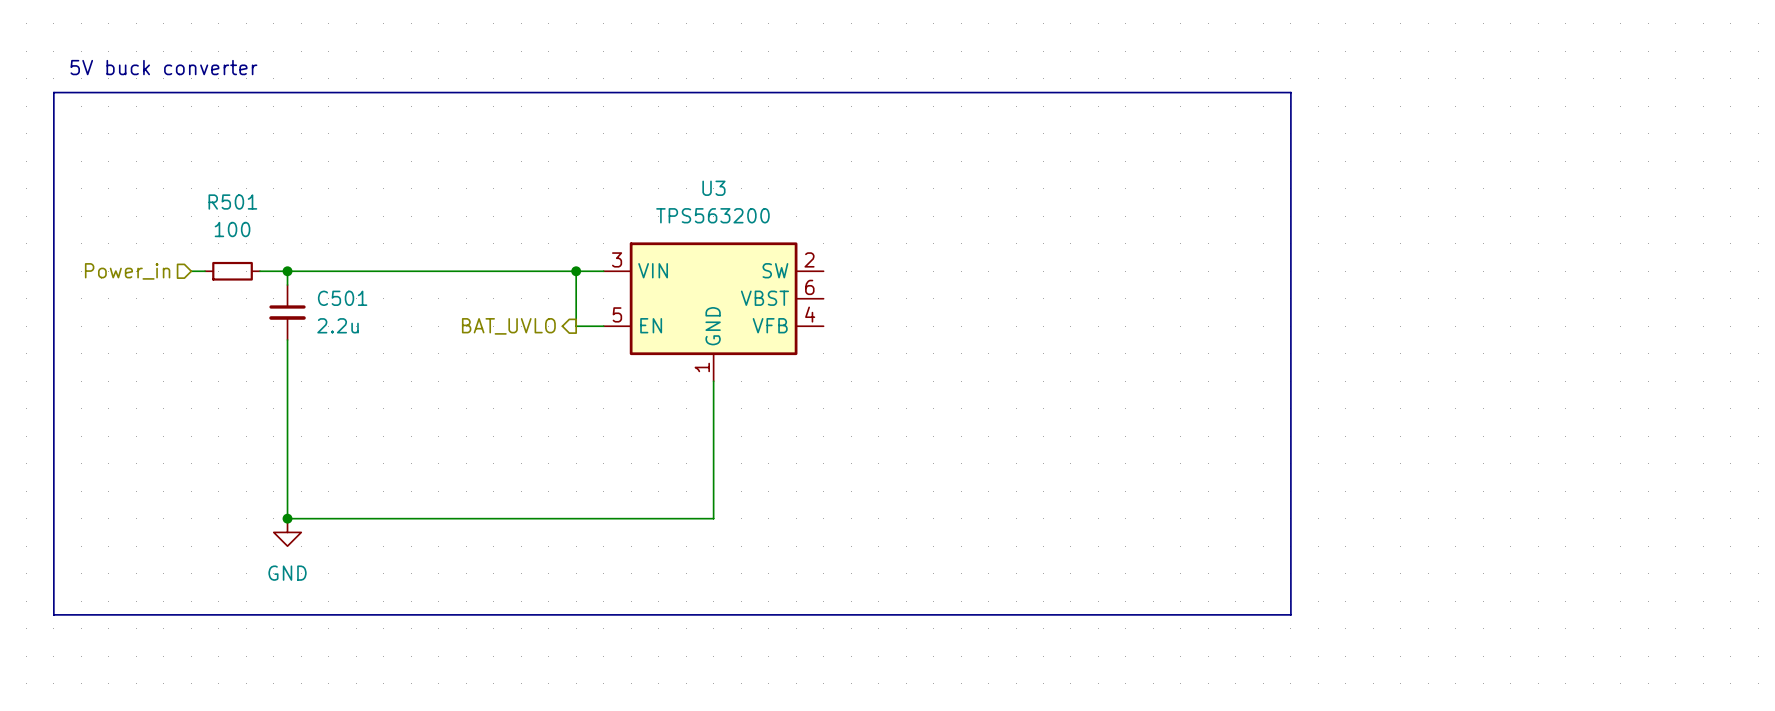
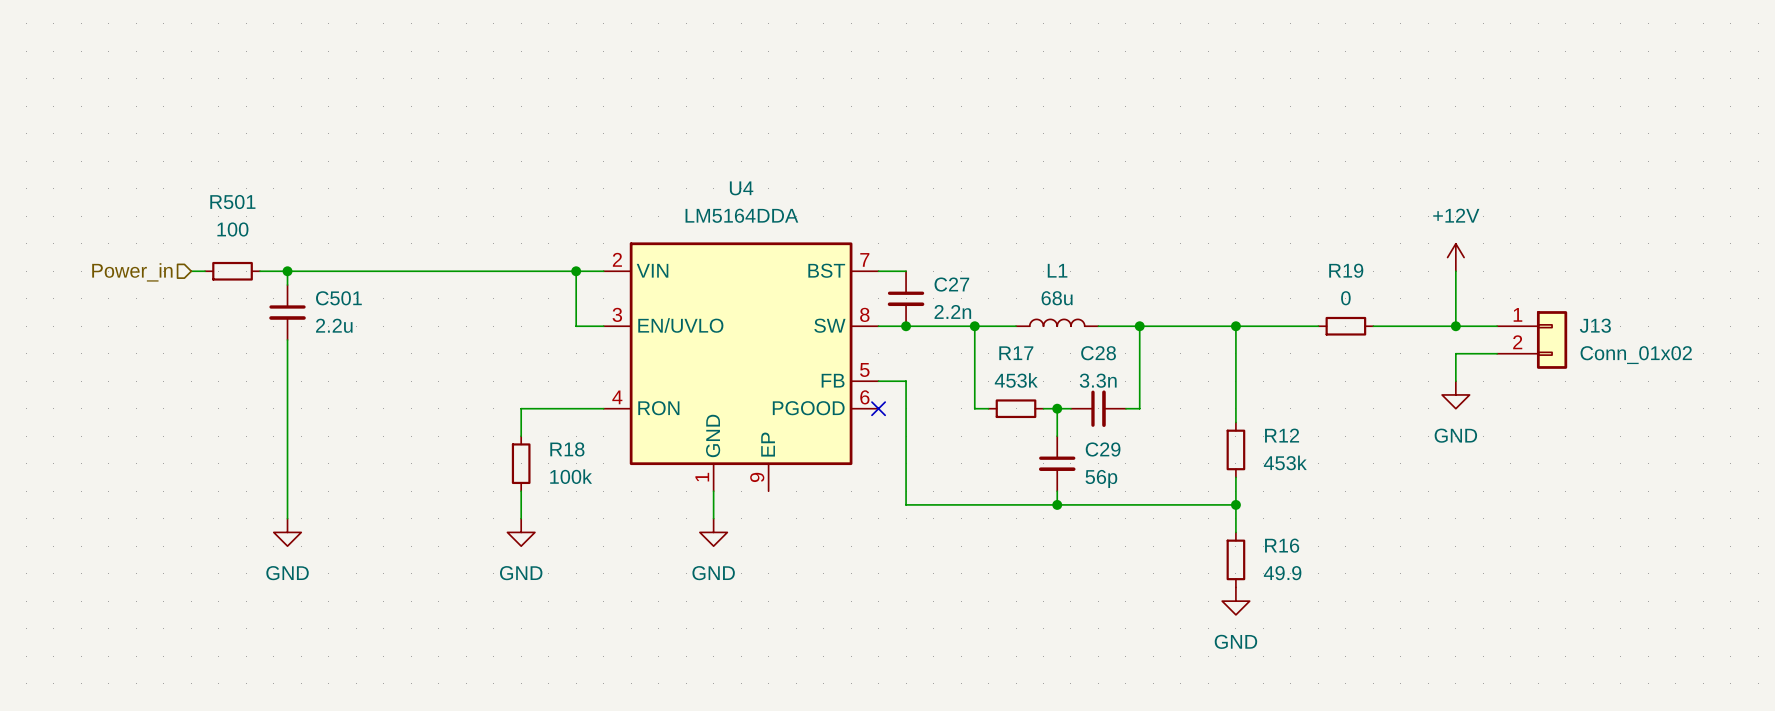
text: 5V buck converter (163, 67) -> none
line: (53, 92) (1290, 92) (1290, 614) (53, 614) (53, 92) -> none
power symbol: none -> +12V (1455, 257)
wire: none -> (878, 271) (906, 271)
wire: none -> (1455, 271) (1455, 326)
C27: none -> 2.2n (906, 298)
U3: TPS563200 (713, 311) -> none
L1: none -> 68u (1057, 322)
hierarchical label: BAT_UVLO (508, 326) -> none
wire: none -> (878, 326) (1016, 326)
junction: none -> (906, 326)
wire: none -> (974, 326) (974, 408) (988, 408)
junction: none -> (974, 326)
wire: none -> (1098, 326) (1318, 326)
wire: none -> (1139, 326) (1139, 408) (1125, 408)
junction: none -> (1139, 326)
wire: none -> (1235, 326) (1235, 422)
junction: none -> (1235, 326)
R19: none -> 0 (1345, 326)
wire: none -> (1373, 326) (1497, 326)
junction: none -> (1455, 326)
J13: none -> Conn_01x02 (1532, 339)
wire: none -> (1497, 353) (1455, 353) (1455, 381)
U4: none -> LM5164DDA (741, 366)
wire: none -> (878, 381) (906, 381) (906, 504) (1235, 504)
power symbol: none -> GND (1455, 394)
wire: none -> (603, 408) (521, 408) (521, 436)
no-connect mark: none -> (878, 408)
R17: none -> 453k (1016, 408)
wire: none -> (1043, 408) (1070, 408)
wire: none -> (1057, 408) (1057, 436)
junction: none -> (1057, 408)
C28: none -> 3.3n (1098, 408)
R12: none -> 453k (1235, 449)
R18: none -> 100k (521, 463)
C29: none -> 56p (1057, 463)
wire: none -> (1235, 477) (1235, 532)
wire: none -> (521, 491) (521, 518)
wire: none -> (1057, 491) (1057, 504)
junction: none -> (1057, 504)
junction: none -> (1235, 504)
wire: (287, 518) (713, 518) -> none
junction: (287, 518) -> none
power symbol: none -> GND (521, 532)
power symbol: none -> GND (713, 532)
R16: none -> 49.9 (1235, 559)
power symbol: none -> GND (1235, 601)

